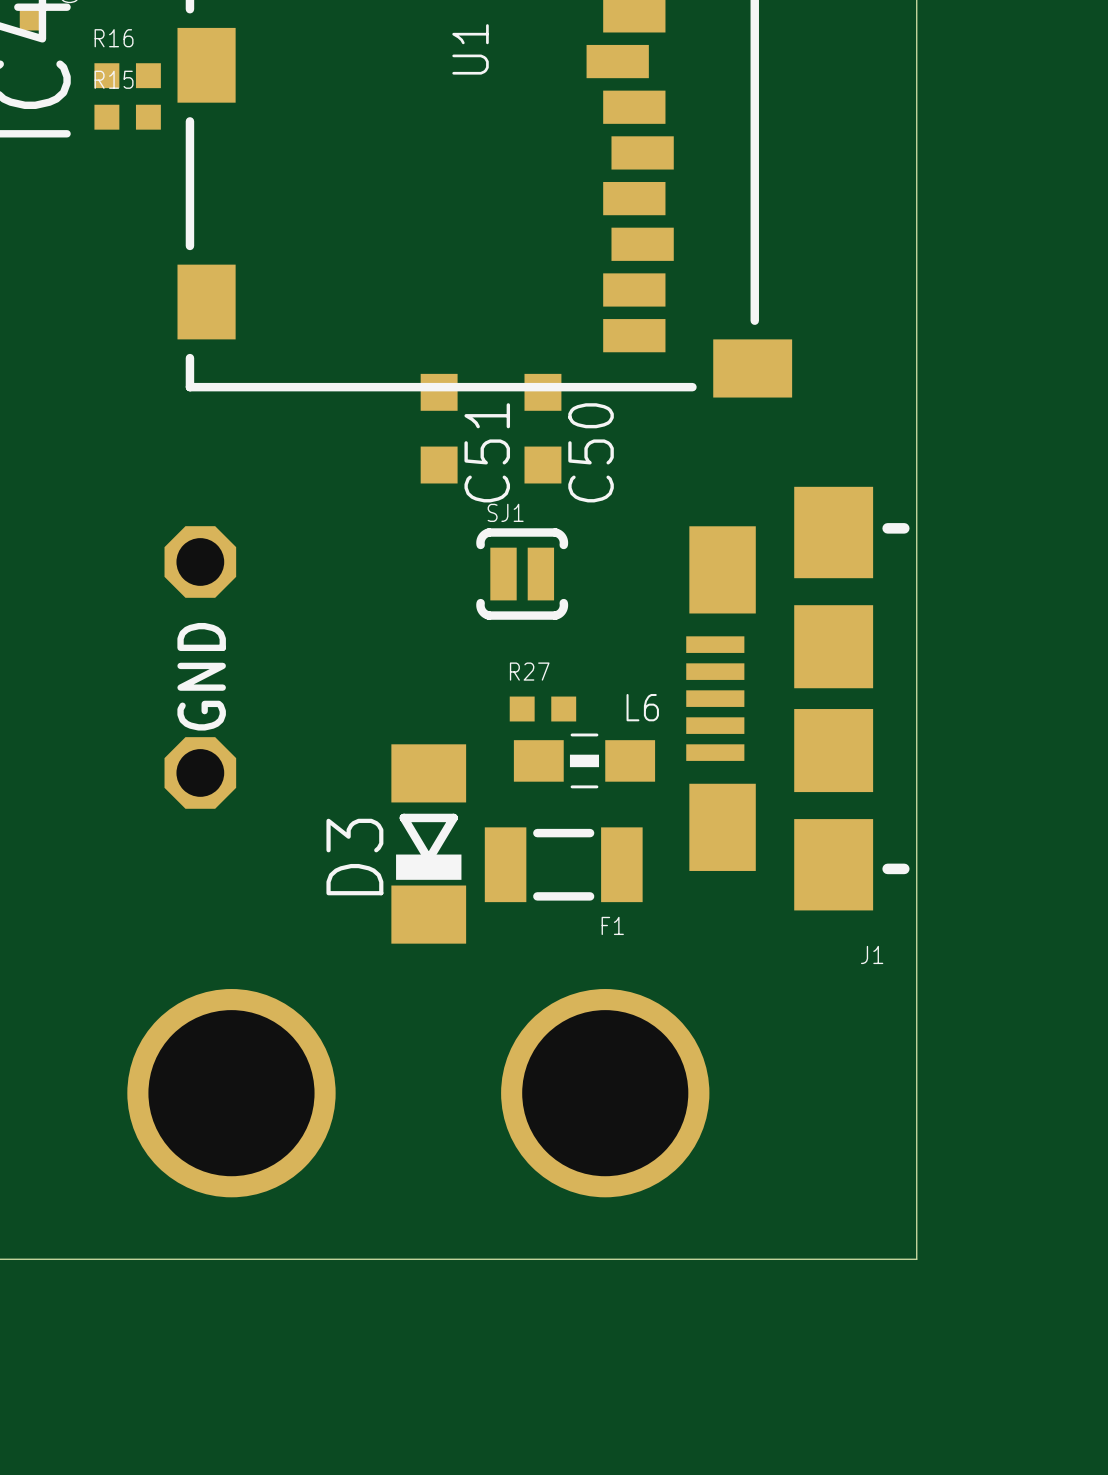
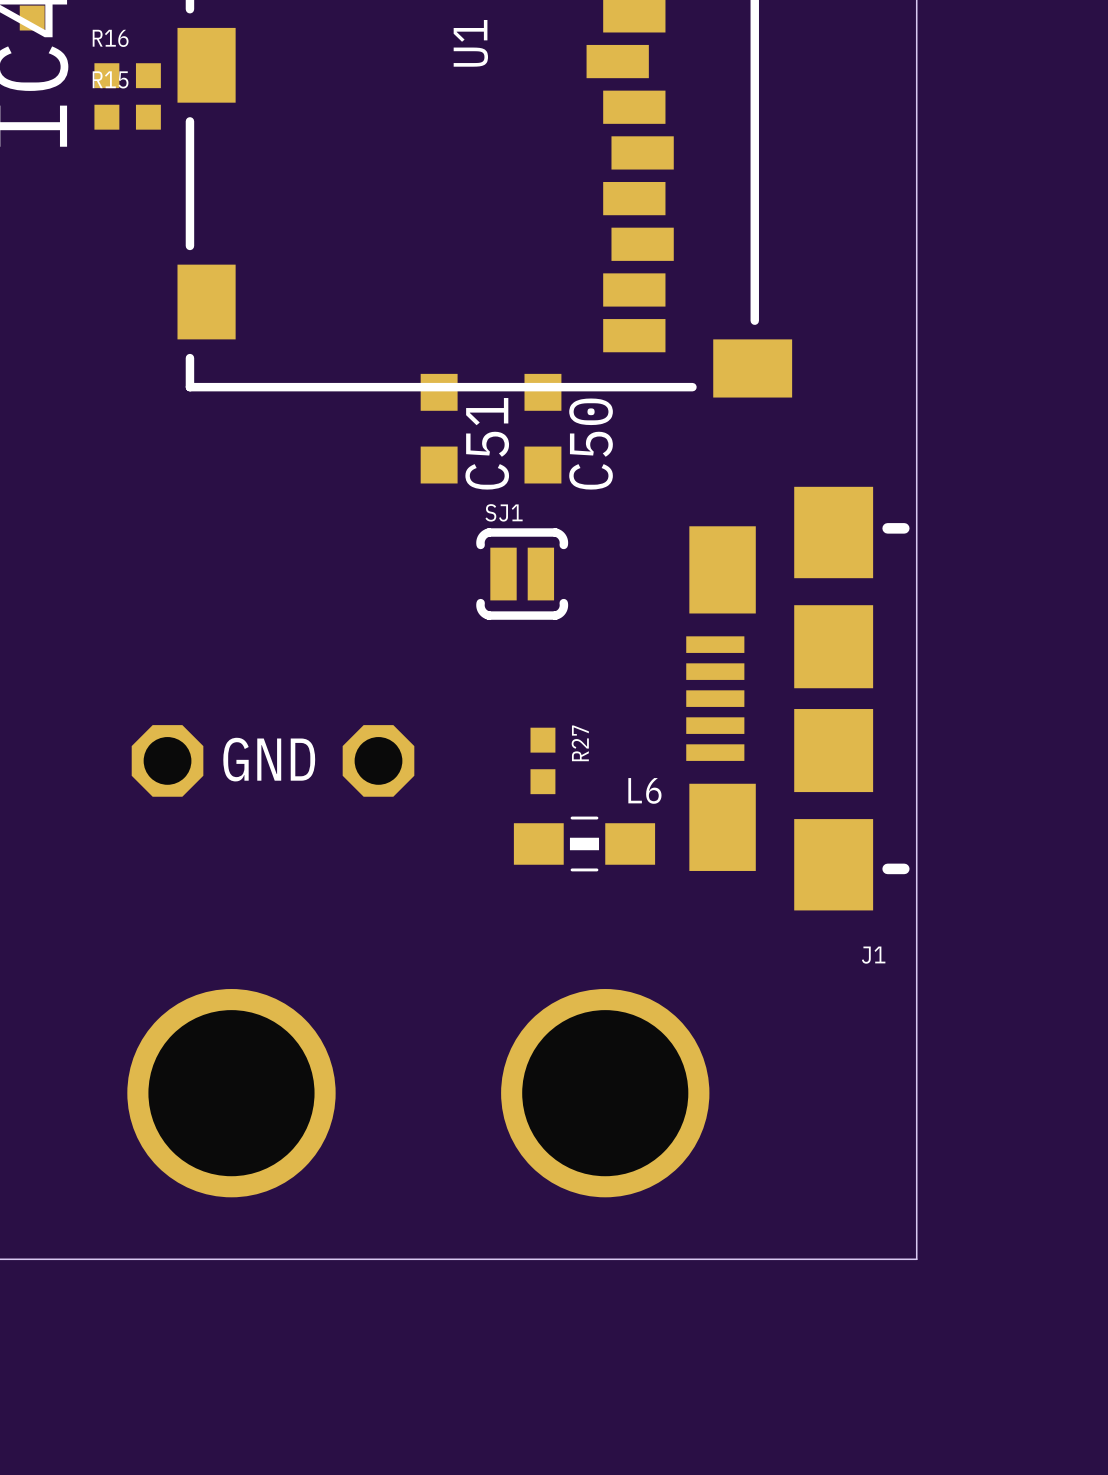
part: (200, 667) -> none
R27 rotation: 0° (542, 709) -> 90° clockwise (542, 760)
R27 position: (542, 709) -> (542, 760)
part: none -> (273, 760)
L6 position: (584, 760) -> (584, 843)
D3: (428, 843) -> none
F1: (563, 864) -> none

